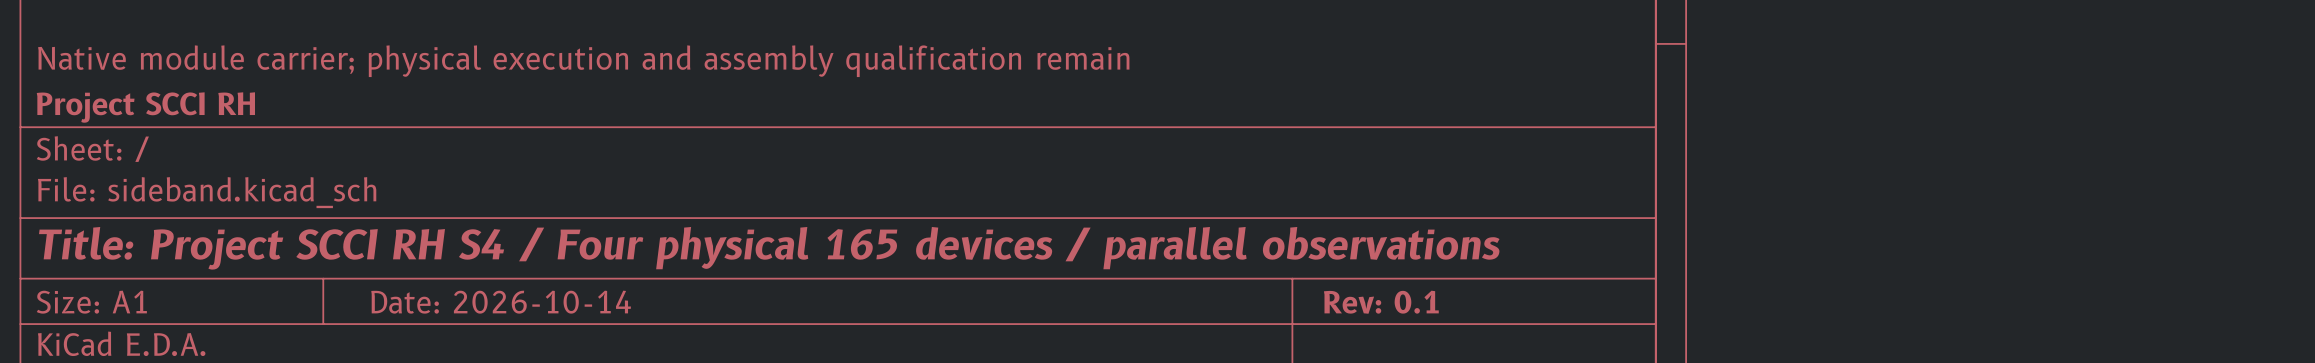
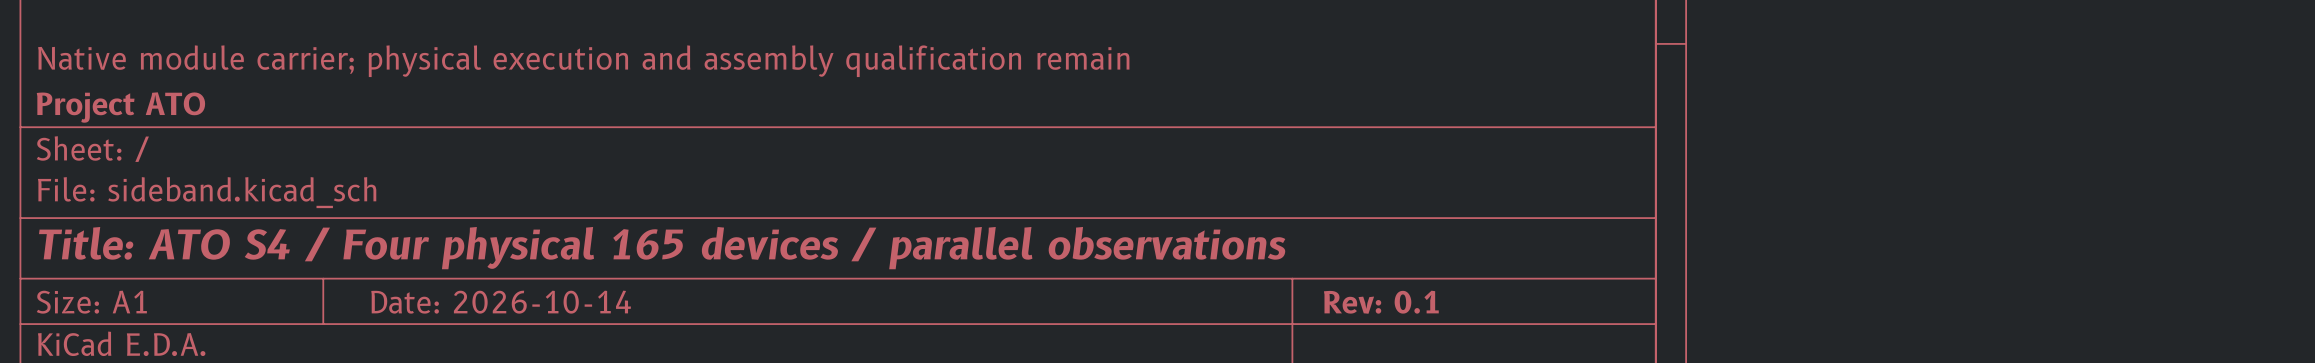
title block: Project SCCI RH (145, 107) -> Project ATO (120, 107)
title block: Title: Project SCCI RH S4 / Four physical 165 devices / parallel observations (769, 248) -> Title: ATO S4 / Four physical 165 devices / parallel observations (662, 248)

